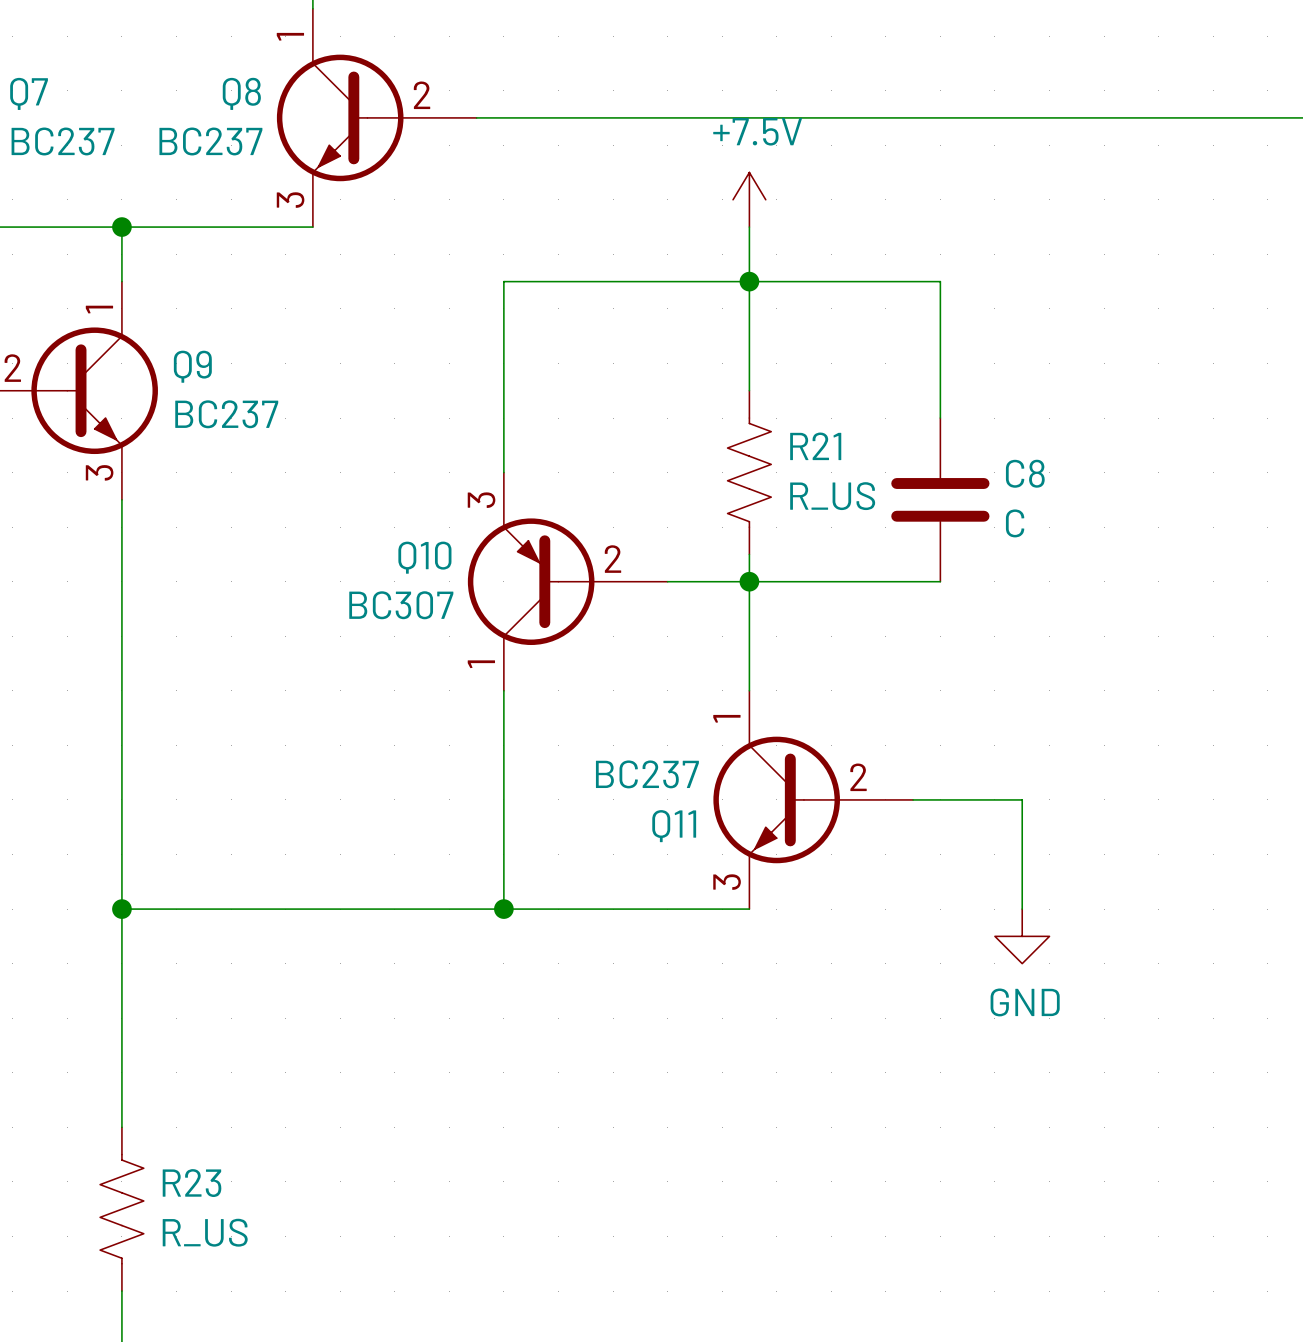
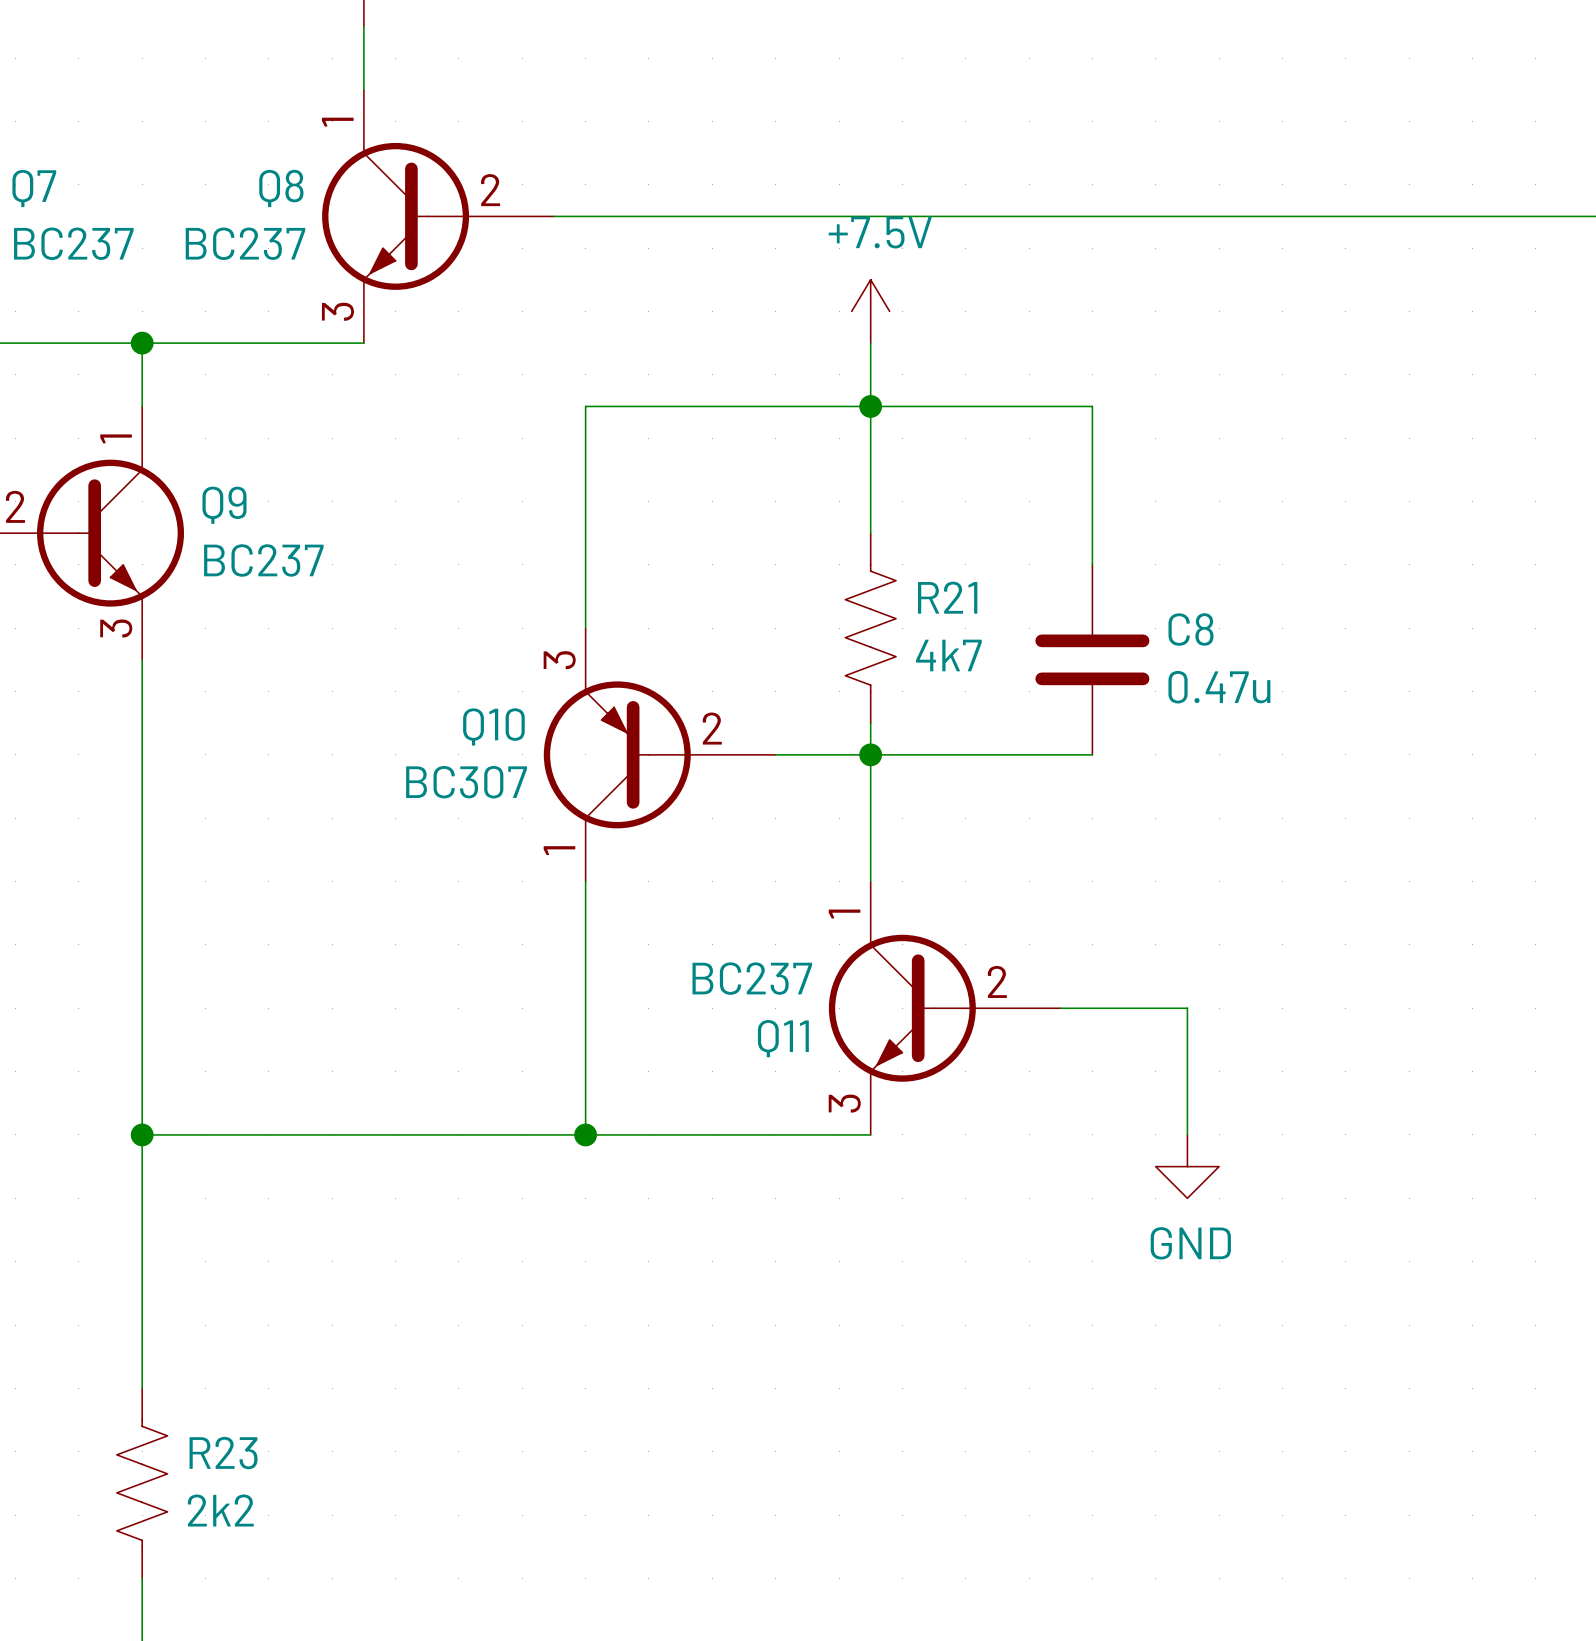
R21 value: R_US (832, 496) -> 4k7 (948, 655)
C8 value: C (1015, 523) -> 0.47u (1219, 687)
R23 value: R_US (205, 1232) -> 2k2 (220, 1510)

